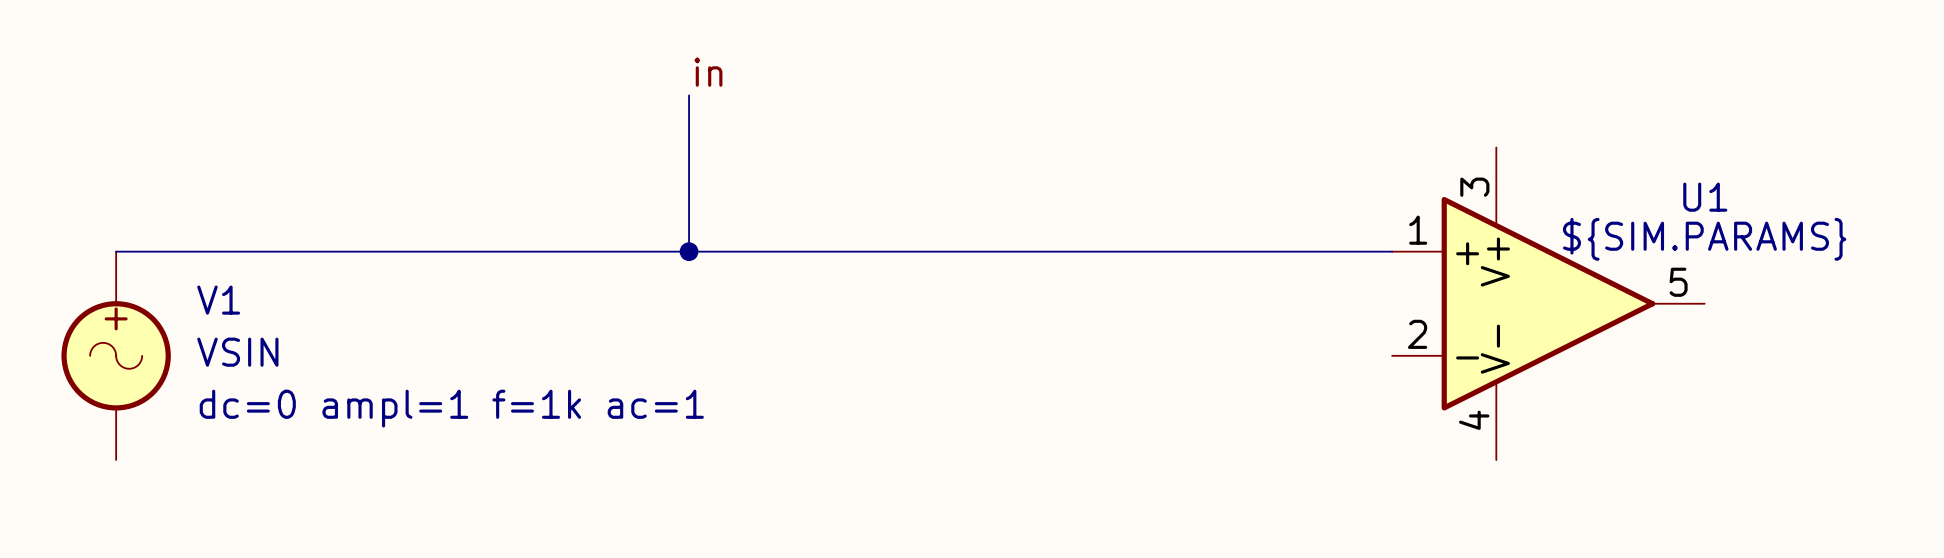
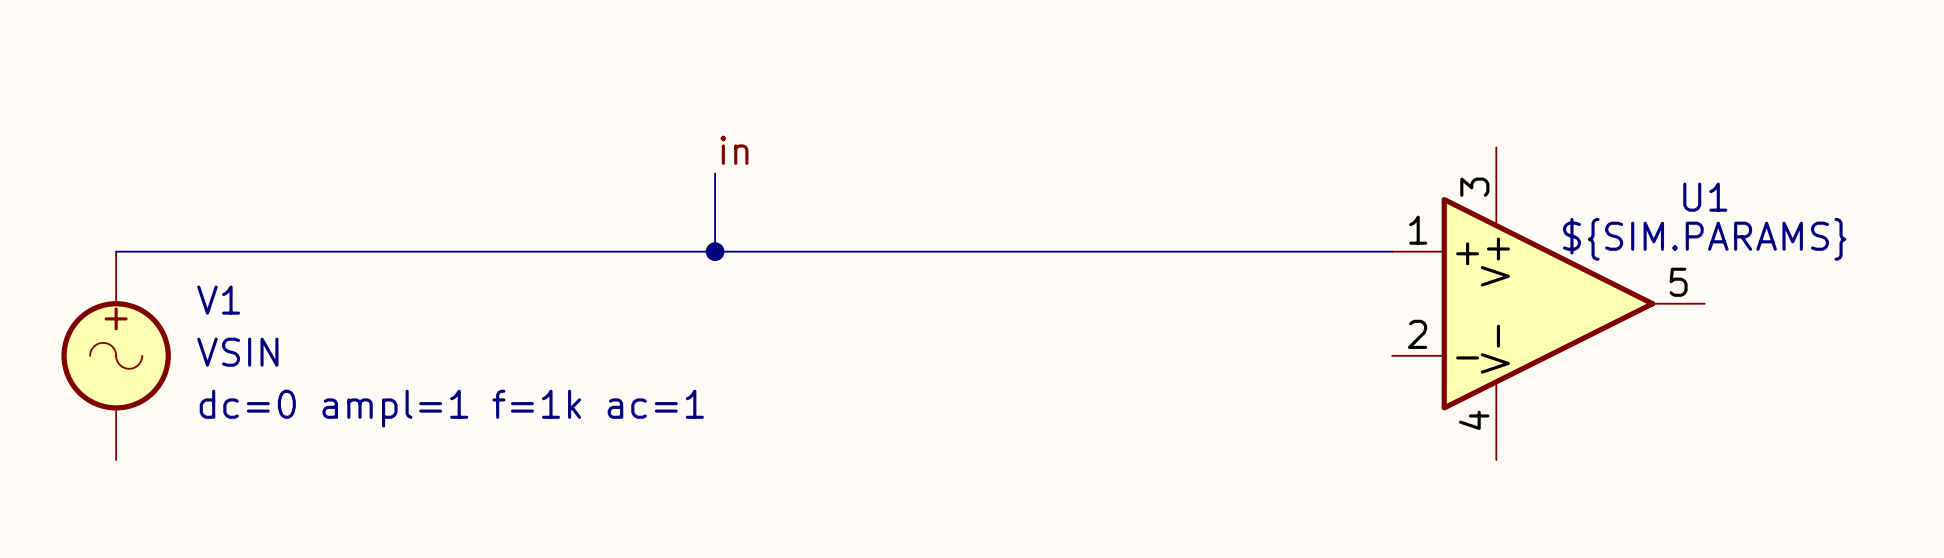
label position: in (708, 72) -> in (734, 150)
wire: (689, 95) (689, 251) -> none
wire: none -> (715, 173) (715, 251)
junction position: (689, 251) -> (715, 251)

